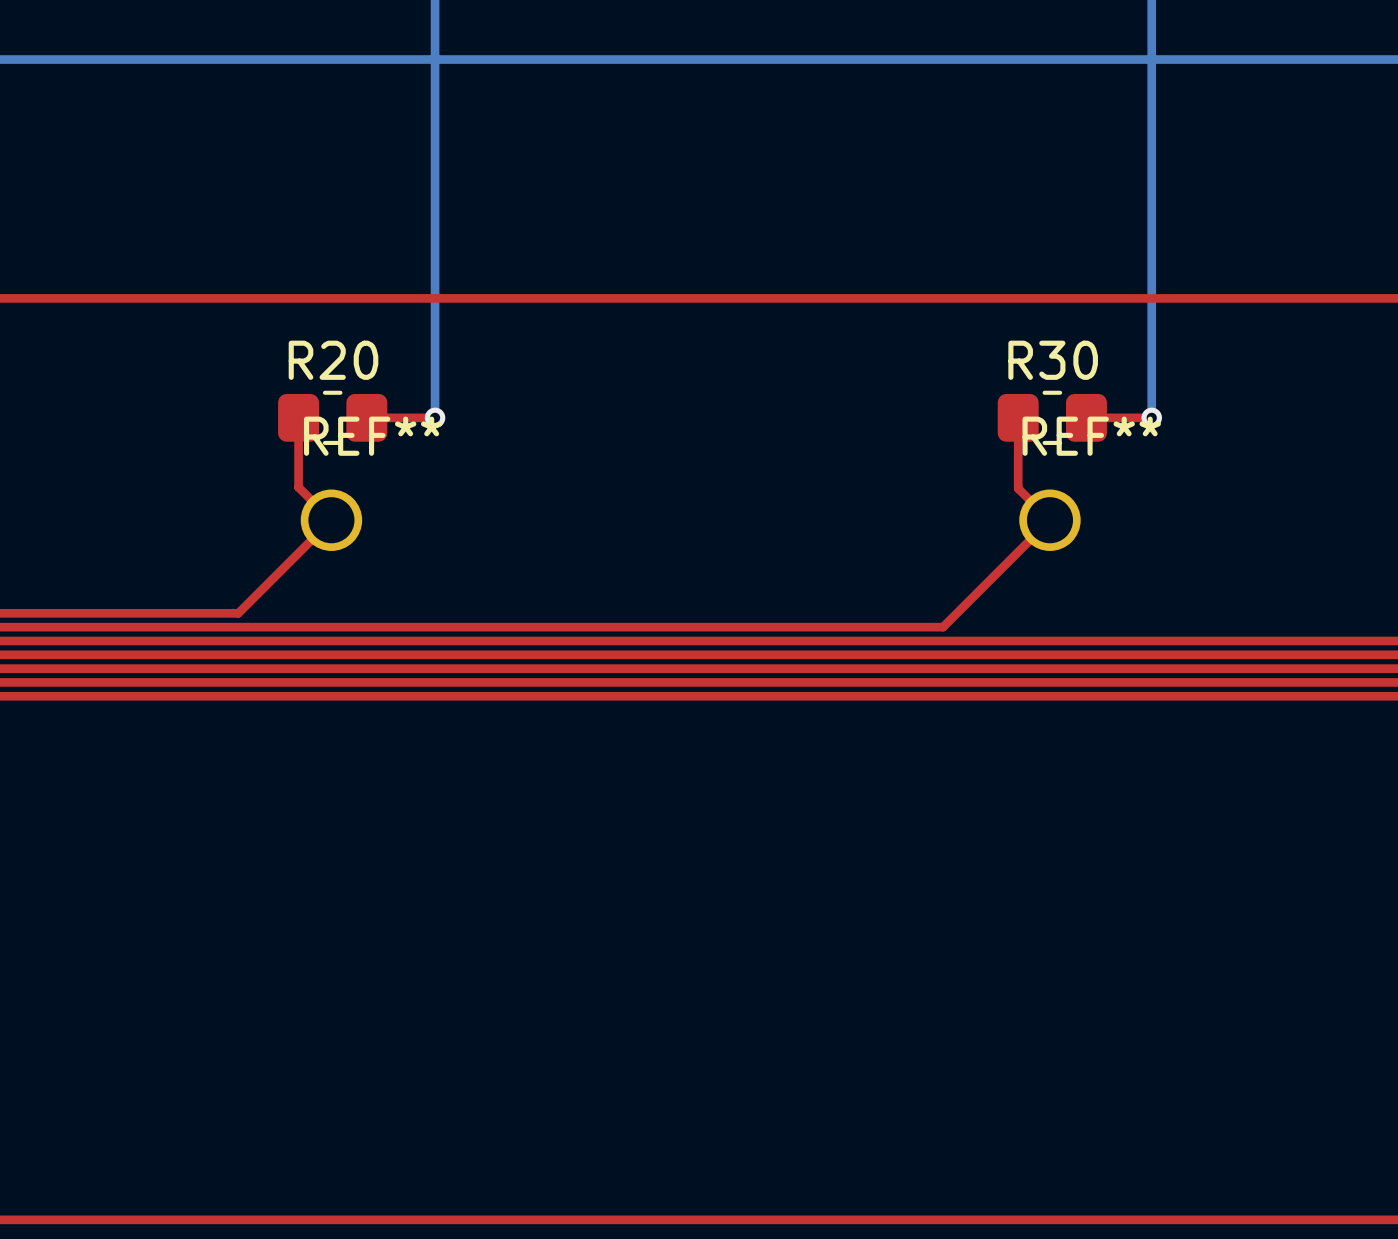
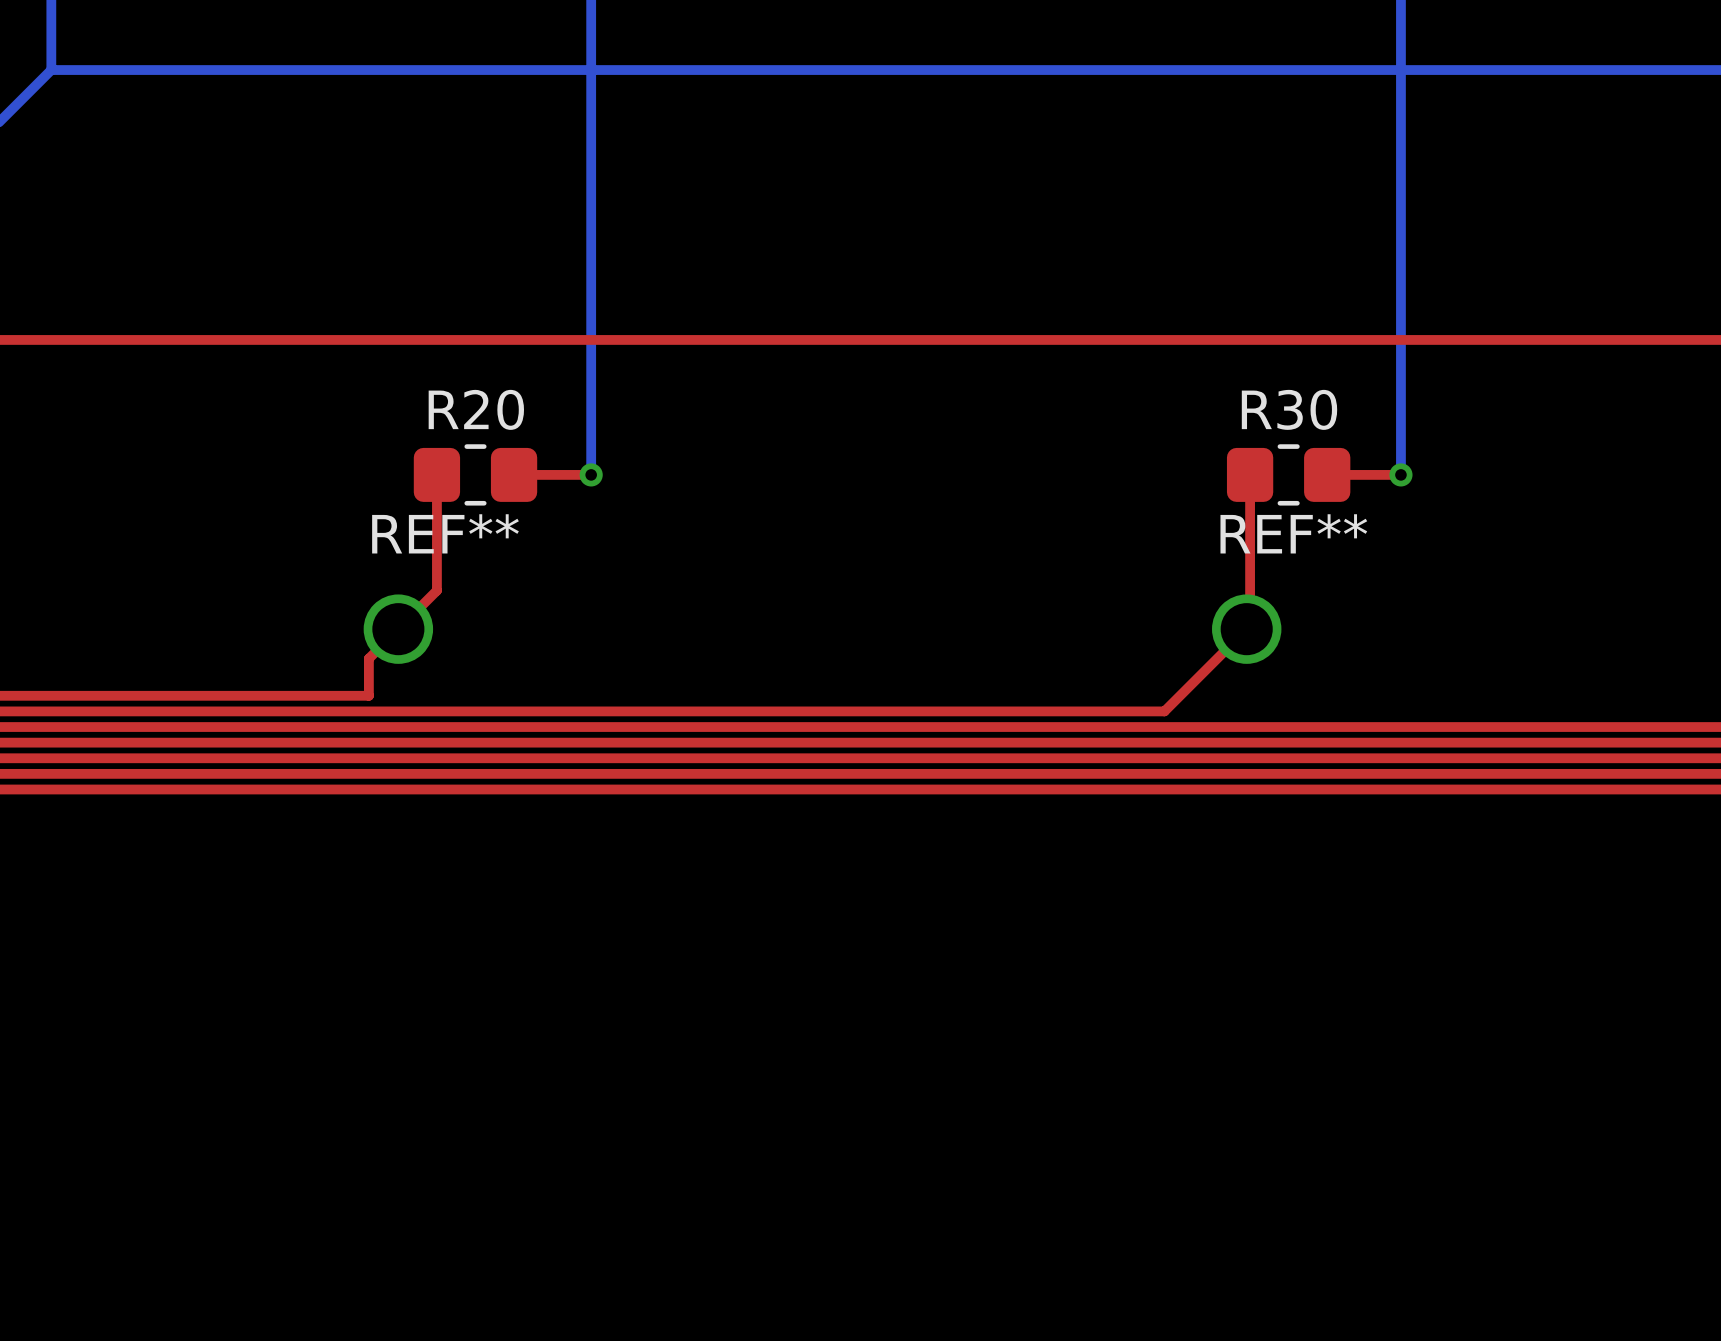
top track: (298, 487) (331, 520) (238, 613) -> (436, 553) (436, 590) (368, 658) (368, 695)
top track: (1018, 488) (1049, 520) (943, 627) -> (1250, 554) (1250, 625) (1164, 711)
REF** position: (331, 520) -> (398, 629)
REF** position: (1049, 520) -> (1246, 629)

